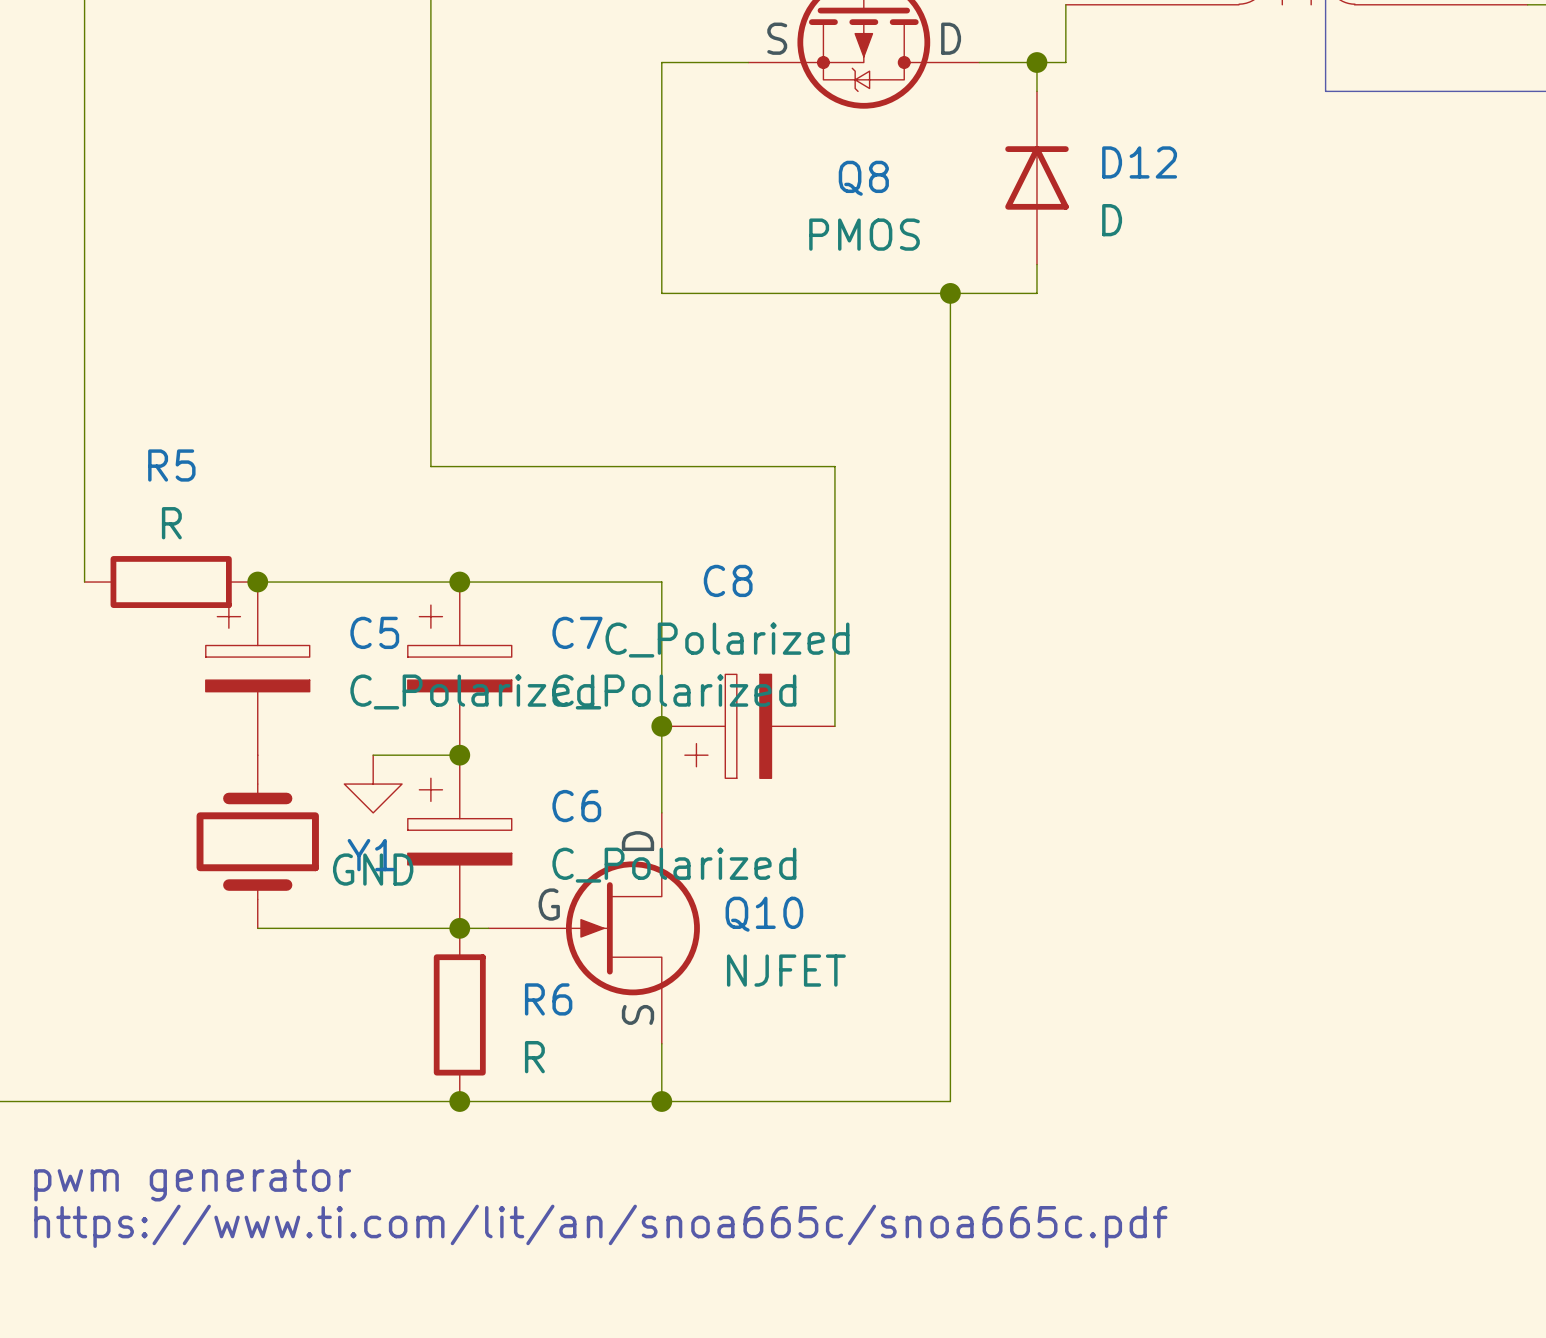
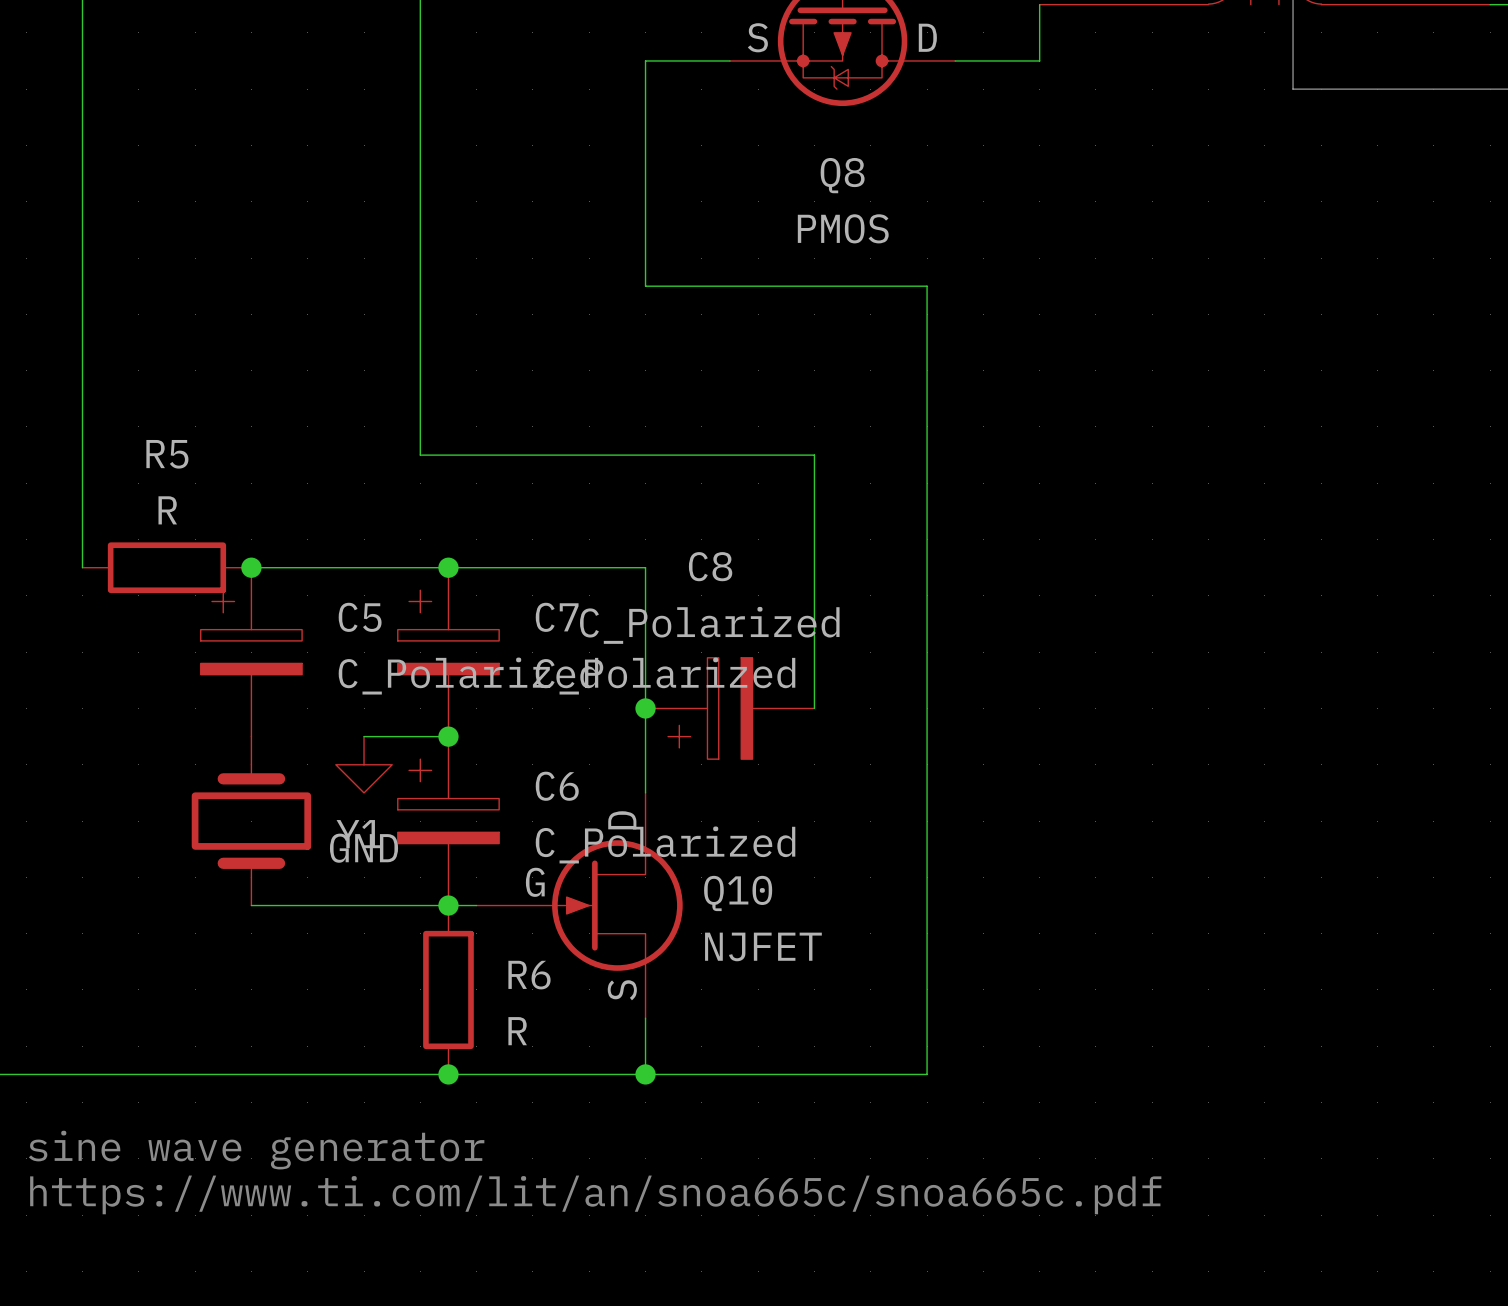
wire: (1036, 62) (1036, 91) -> none
junction: (1036, 62) -> none
D12: D (1036, 177) -> none
wire: (1036, 264) (1036, 293) (950, 293) -> none
junction: (950, 293) -> none
text: pwm generator (192, 1180) -> sine wave generator (256, 1150)

